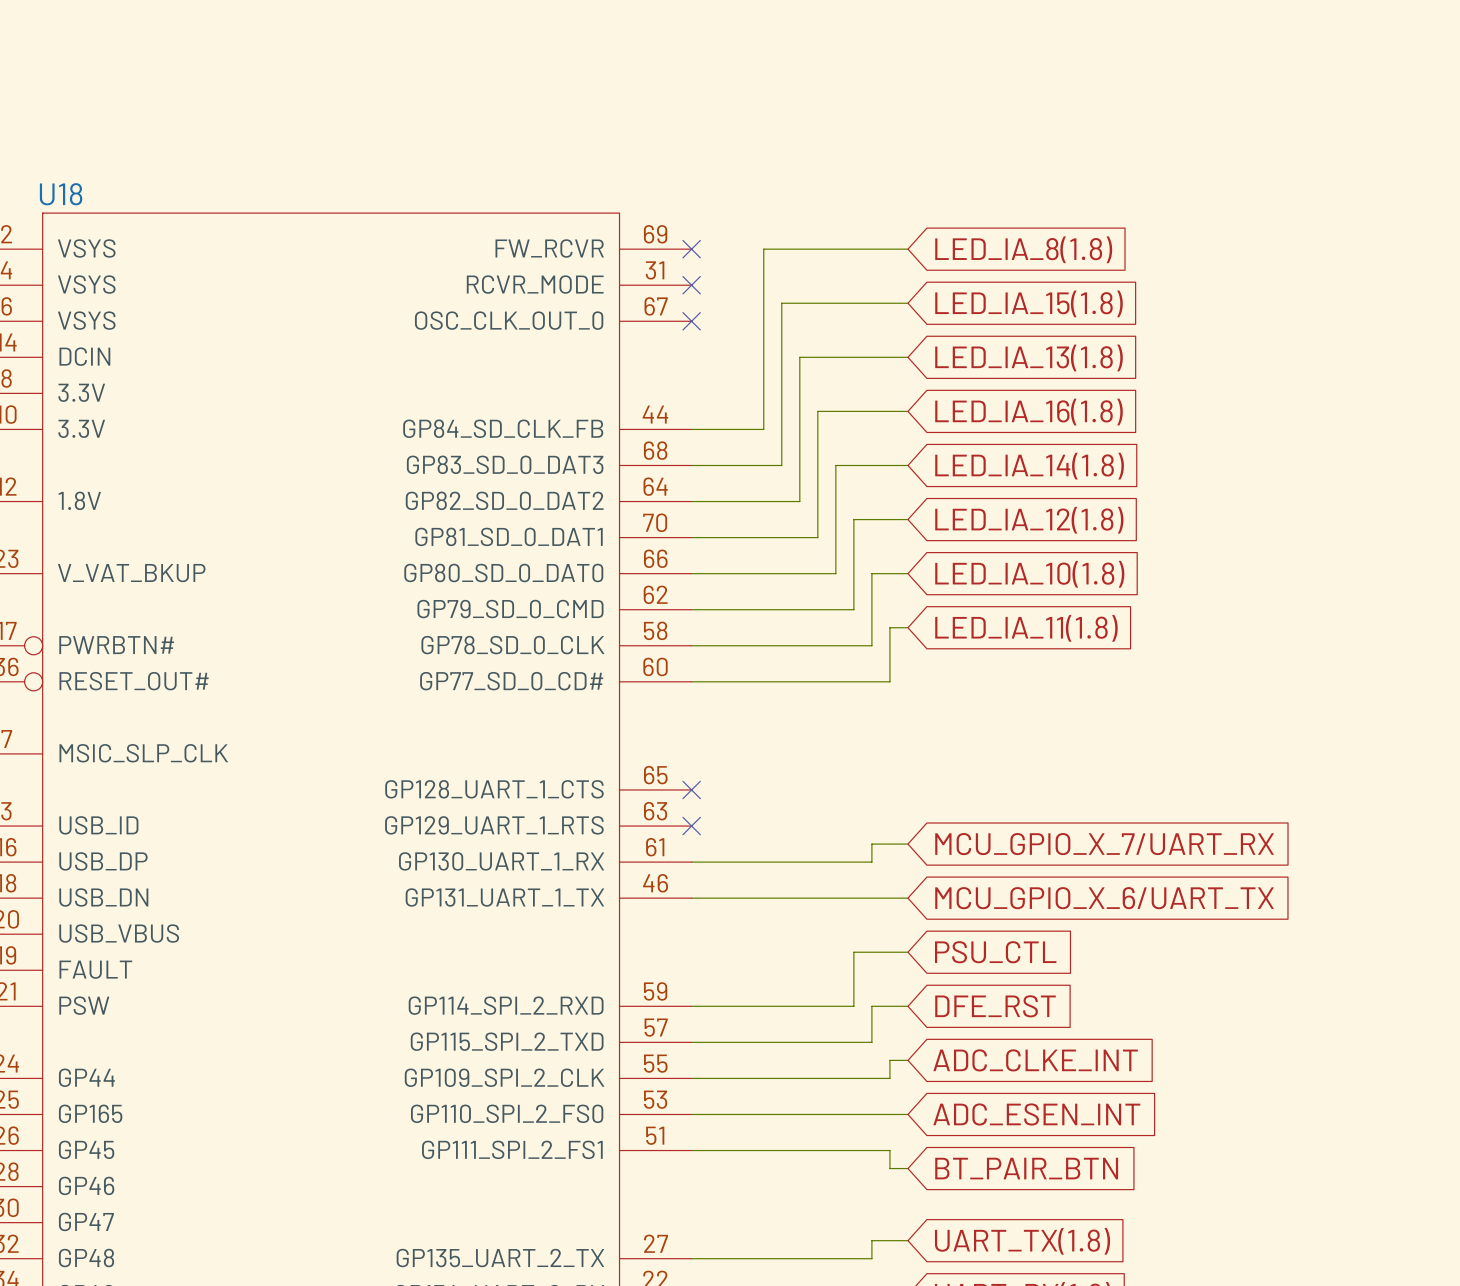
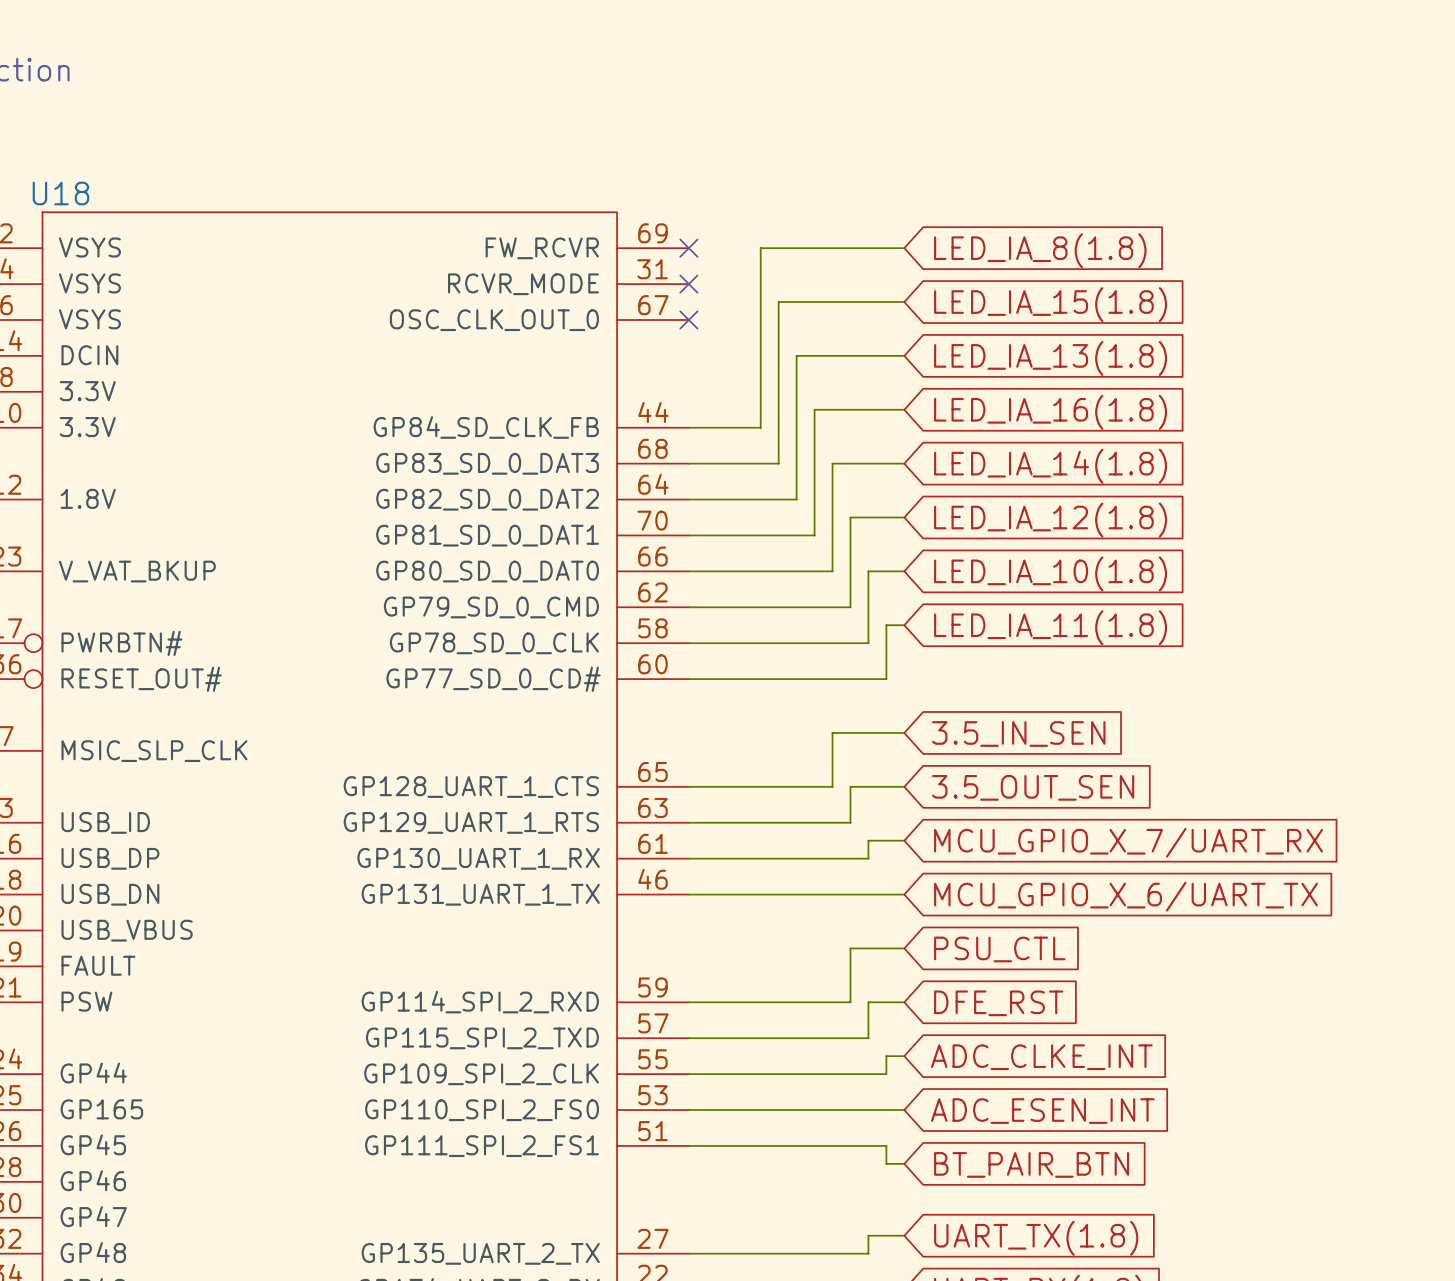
wire: none -> (904, 732) (832, 732) (832, 786) (688, 786)
global label: none -> 3.5_IN_SEN (1018, 733)
no-connect mark: (691, 789) -> none
wire: none -> (904, 786) (850, 786) (850, 822) (688, 822)
global label: none -> 3.5_OUT_SEN (1033, 787)
no-connect mark: (691, 826) -> none

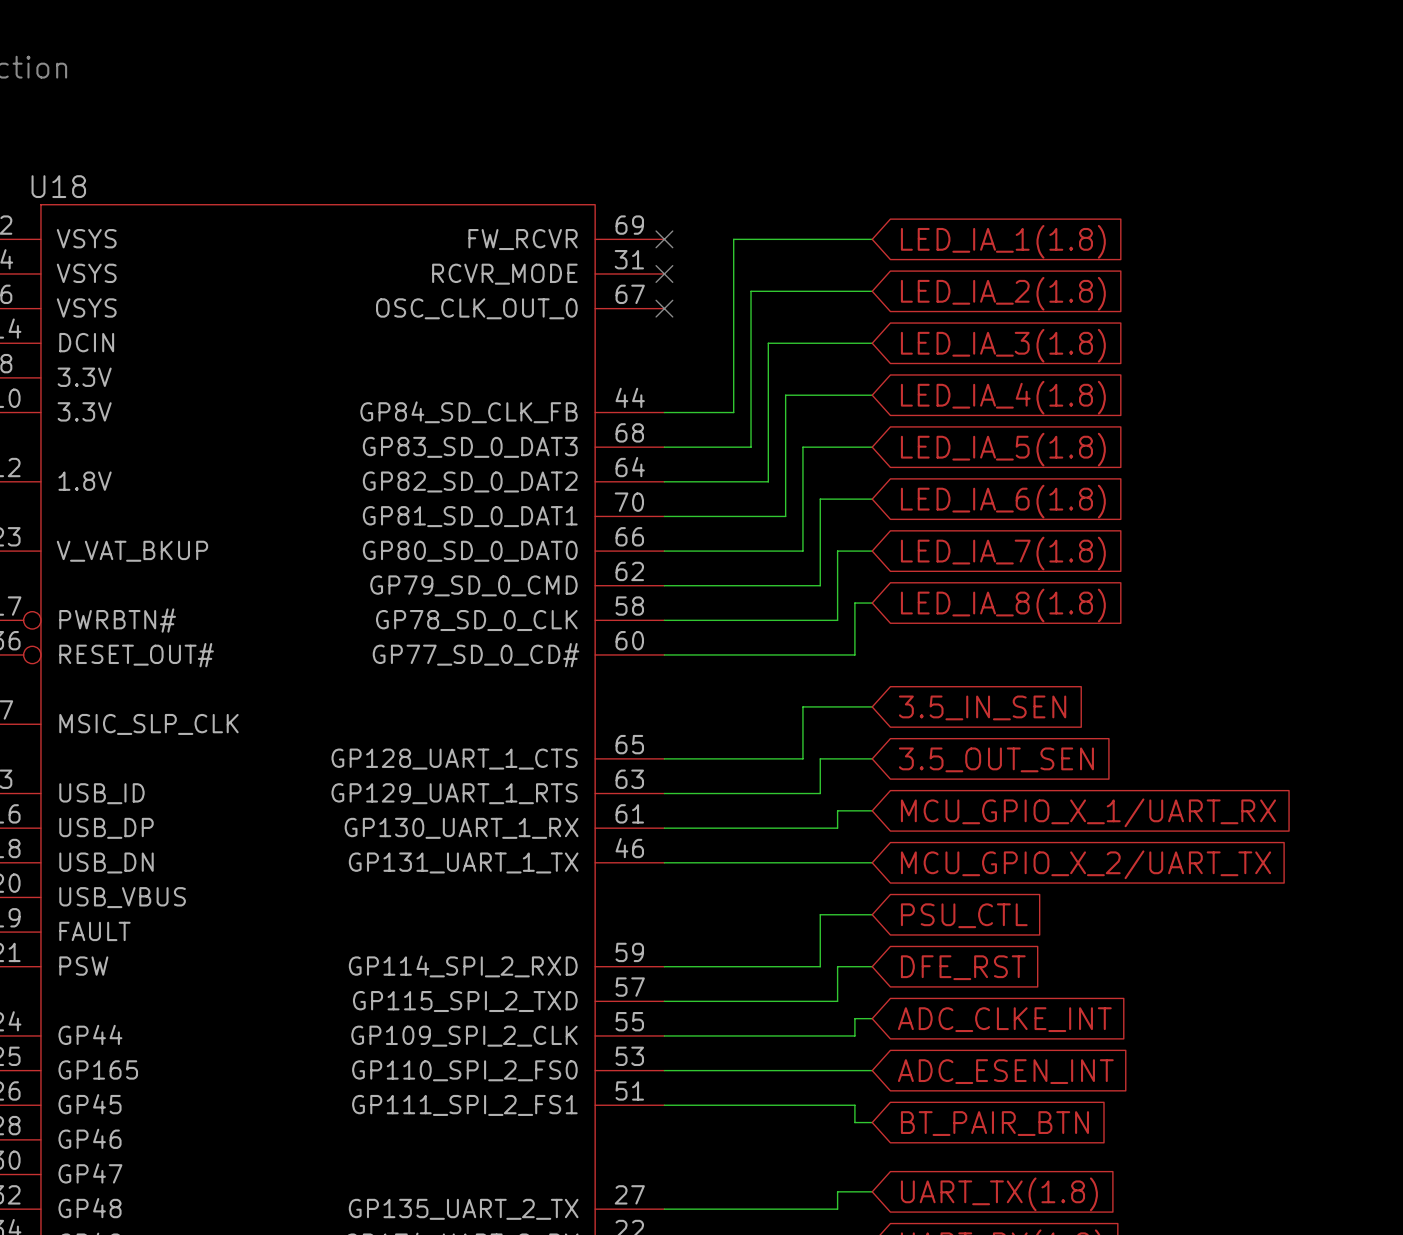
global label: LED_IA_8(1.8) (1040, 250) -> LED_IA_1(1.8) (1003, 241)
global label: LED_IA_15(1.8) (1050, 304) -> LED_IA_2(1.8) (1003, 293)
global label: LED_IA_13(1.8) (1050, 358) -> LED_IA_3(1.8) (1003, 345)
global label: LED_IA_16(1.8) (1050, 412) -> LED_IA_4(1.8) (1003, 397)
global label: LED_IA_14(1.8) (1050, 466) -> LED_IA_5(1.8) (1003, 449)
global label: LED_IA_12(1.8) (1050, 520) -> LED_IA_6(1.8) (1003, 501)
global label: LED_IA_10(1.8) (1050, 573) -> LED_IA_7(1.8) (1003, 553)
global label: LED_IA_11(1.8) (1050, 627) -> LED_IA_8(1.8) (1003, 605)
global label: MCU_GPIO_X_7/UART_RX (1128, 842) -> MCU_GPIO_X_1/UART_RX (1088, 812)
global label: MCU_GPIO_X_6/UART_TX (1125, 896) -> MCU_GPIO_X_2/UART_TX (1085, 864)

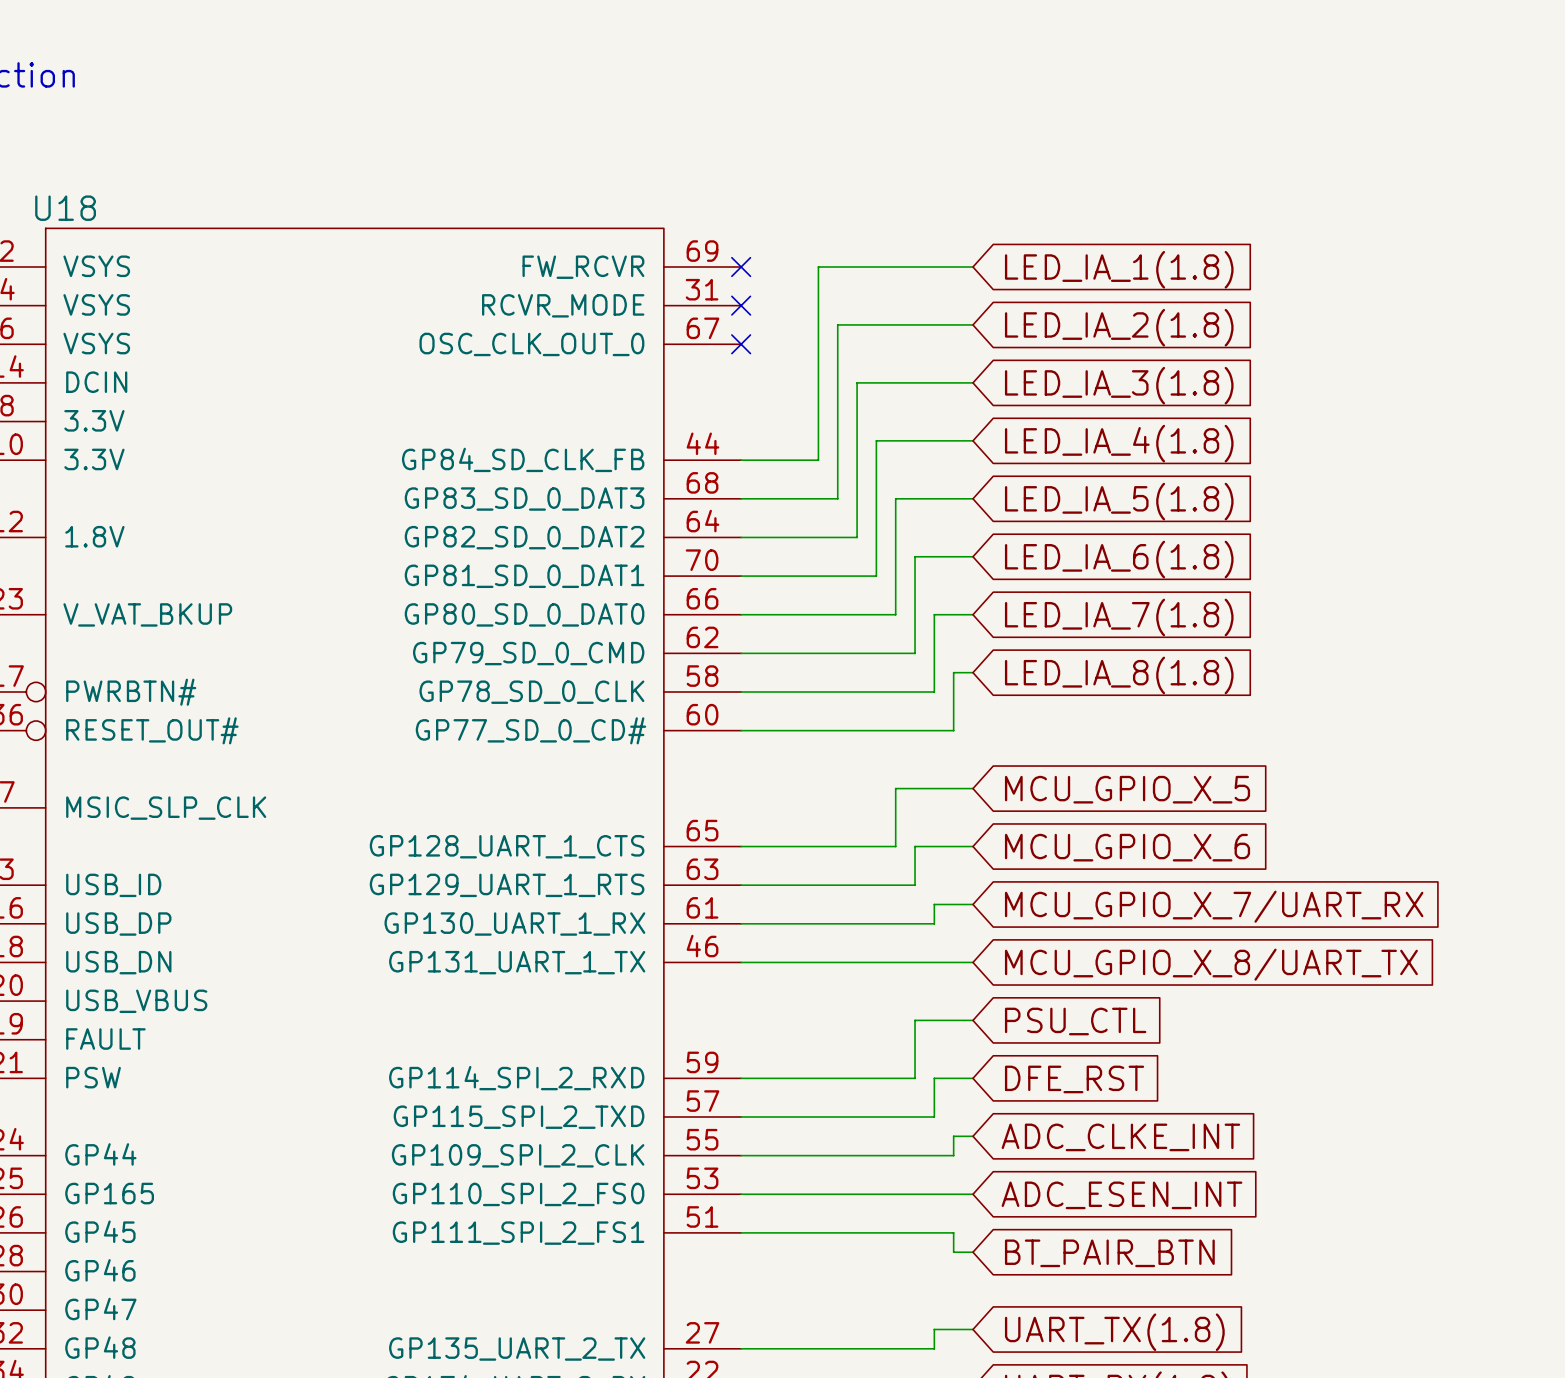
global label: 3.5_IN_SEN (982, 707) -> MCU_GPIO_X_5 (1127, 789)
global label: 3.5_OUT_SEN (996, 759) -> MCU_GPIO_X_6 (1127, 847)
global label: MCU_GPIO_X_1/UART_RX (1088, 812) -> MCU_GPIO_X_7/UART_RX (1214, 906)
global label: MCU_GPIO_X_2/UART_TX (1085, 864) -> MCU_GPIO_X_8/UART_TX (1211, 964)

